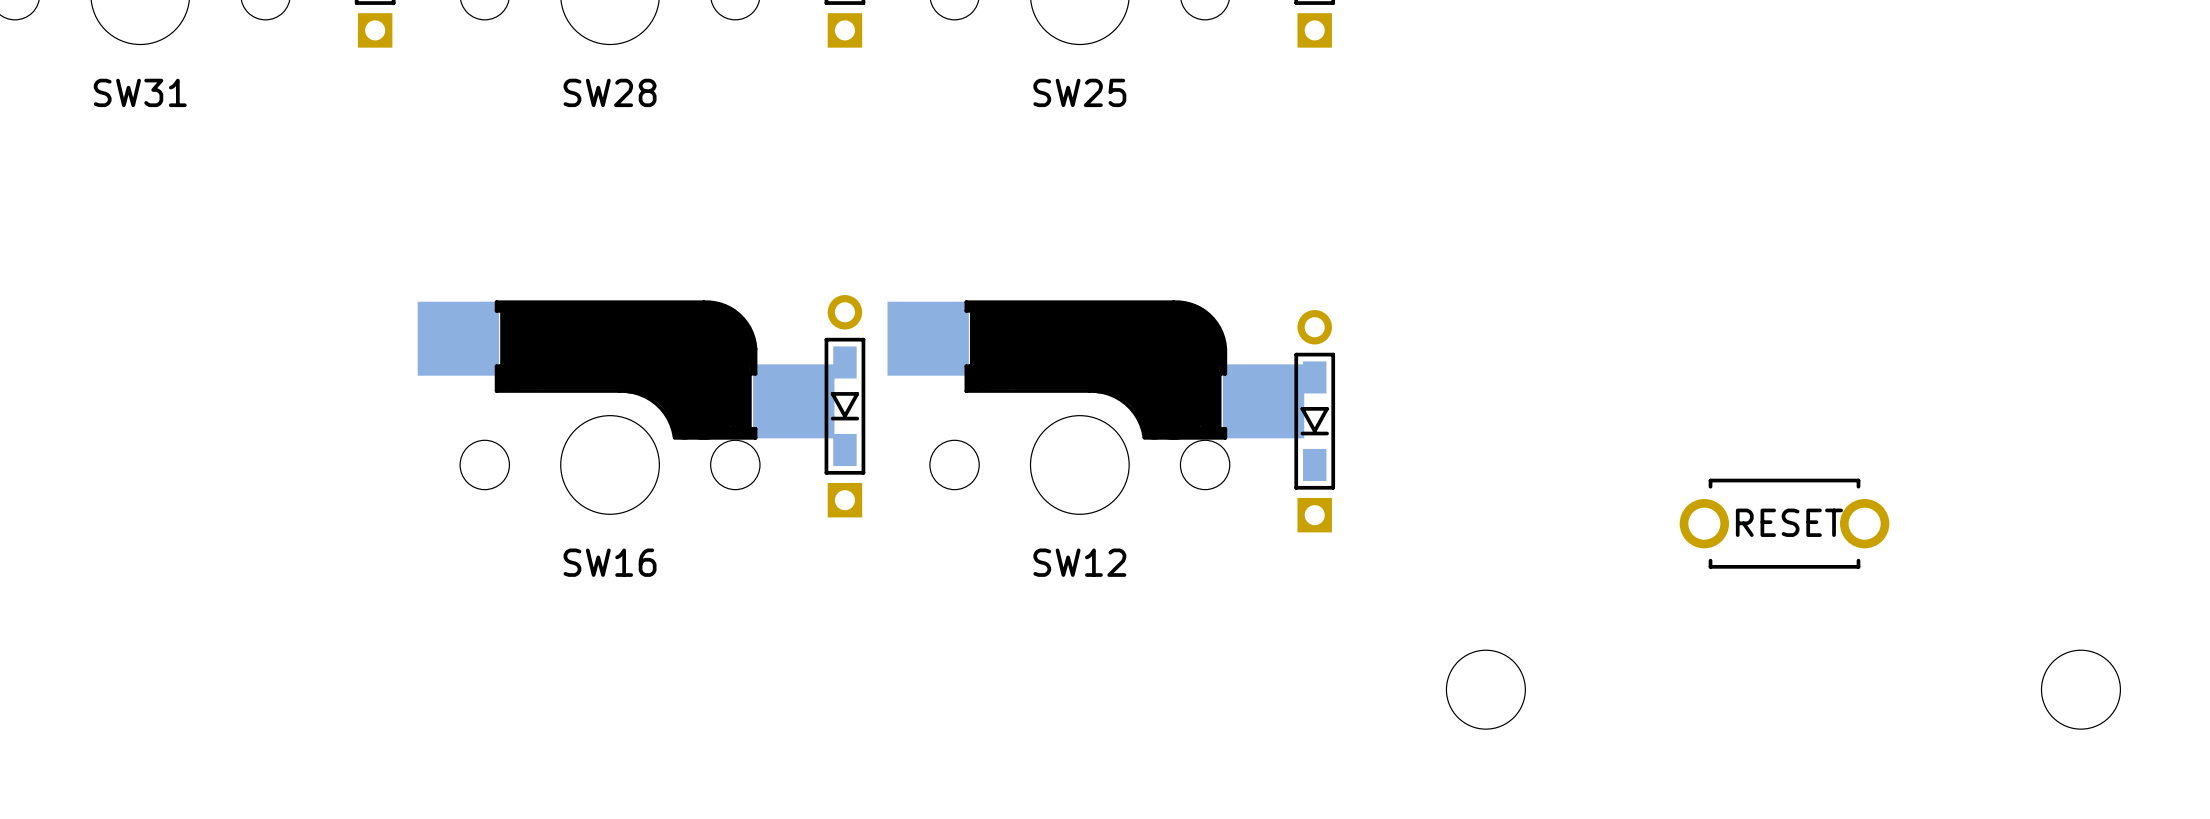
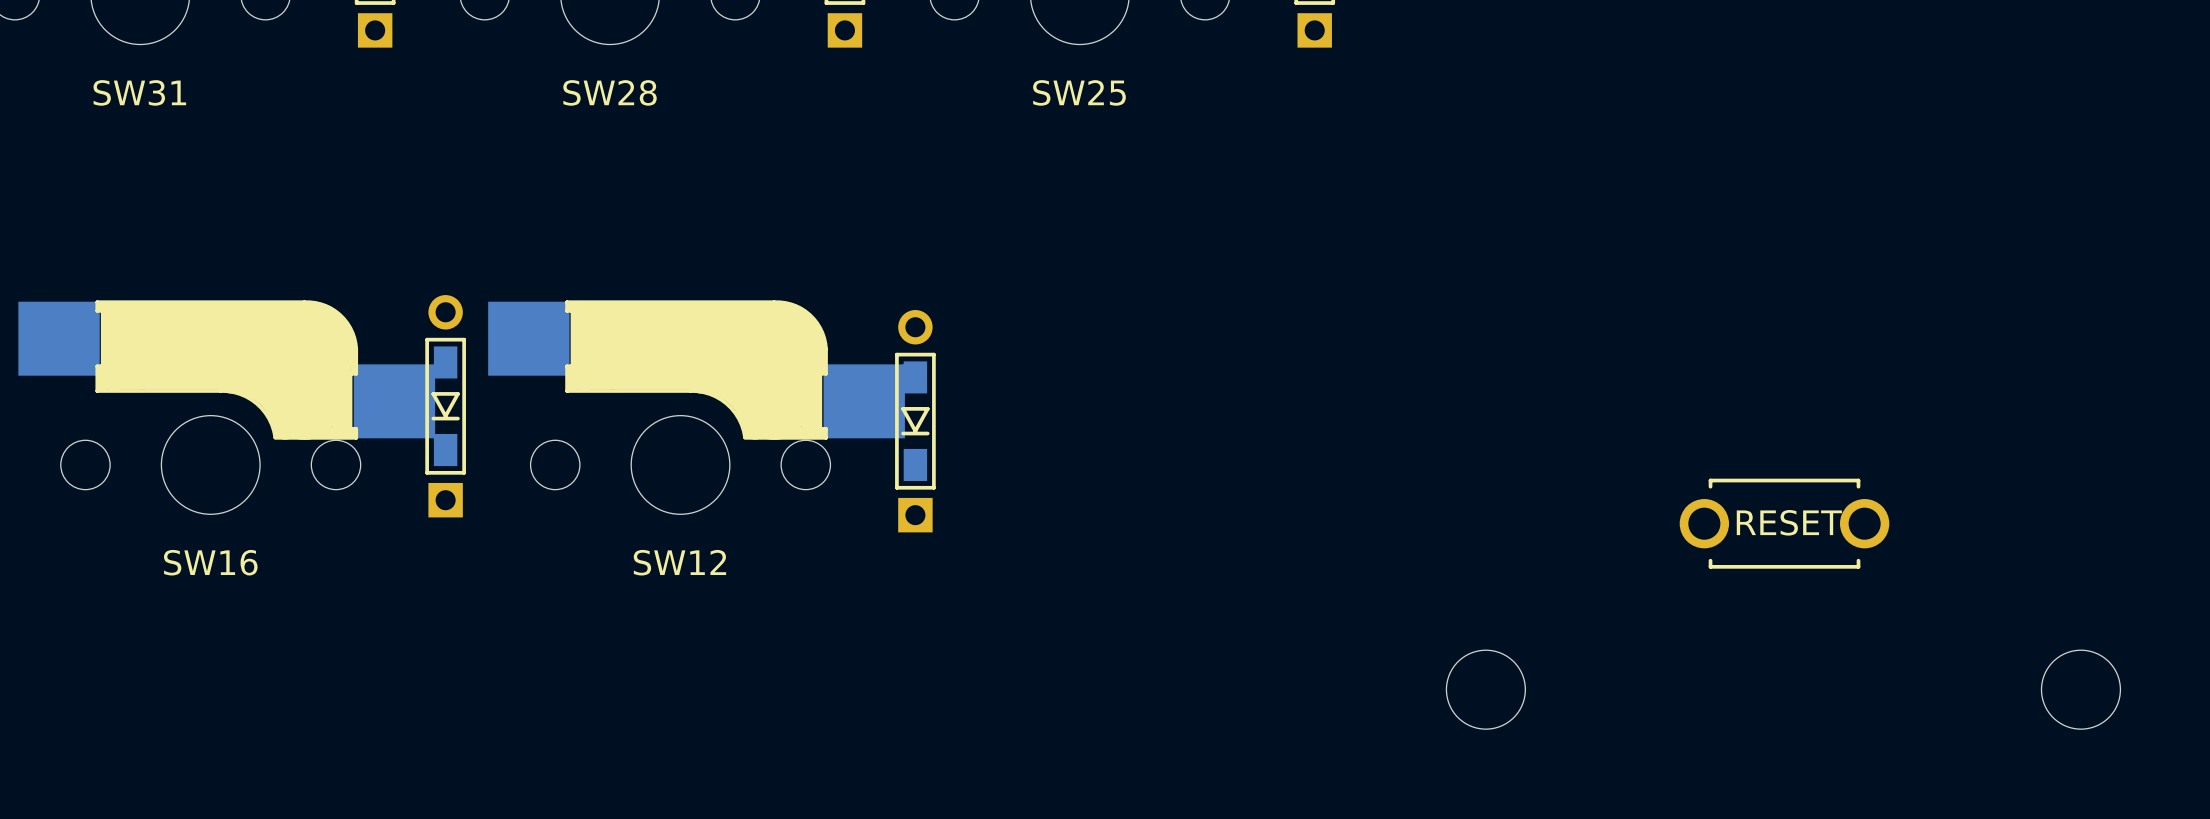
part: none -> (445, 406)
part position: (844, 406) -> (915, 421)
SW16 position: (626, 407) -> (226, 407)
SW12 position: (1095, 407) -> (696, 407)
part: (1314, 421) -> none

